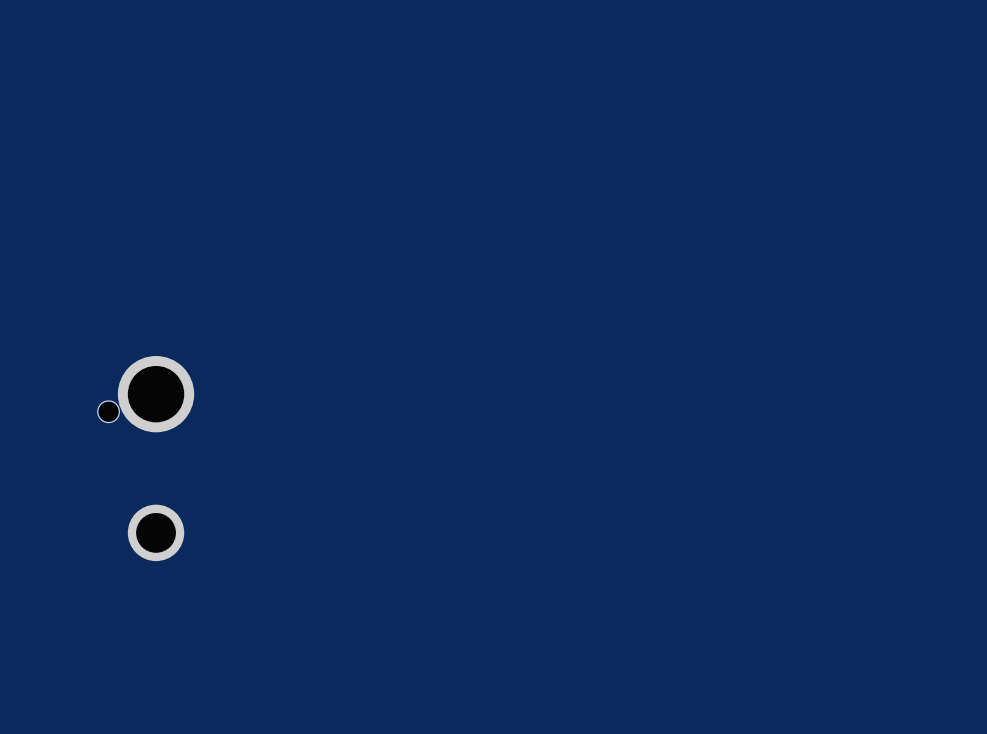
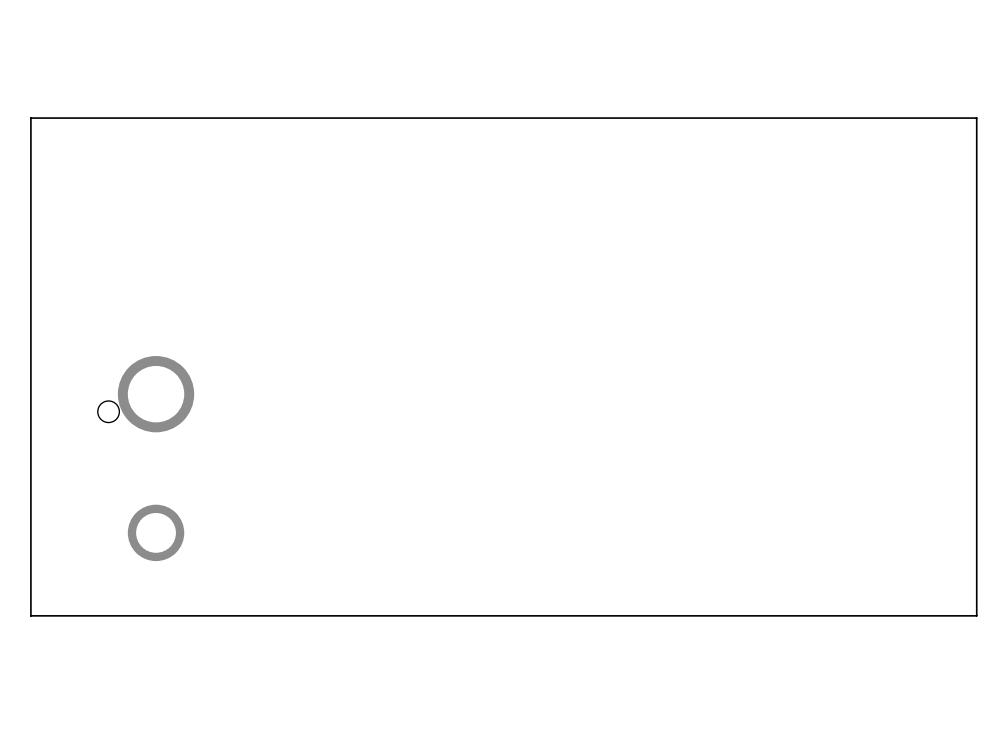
board edge: none -> (976, 118) (976, 615) (30, 615) (30, 118) (976, 118)

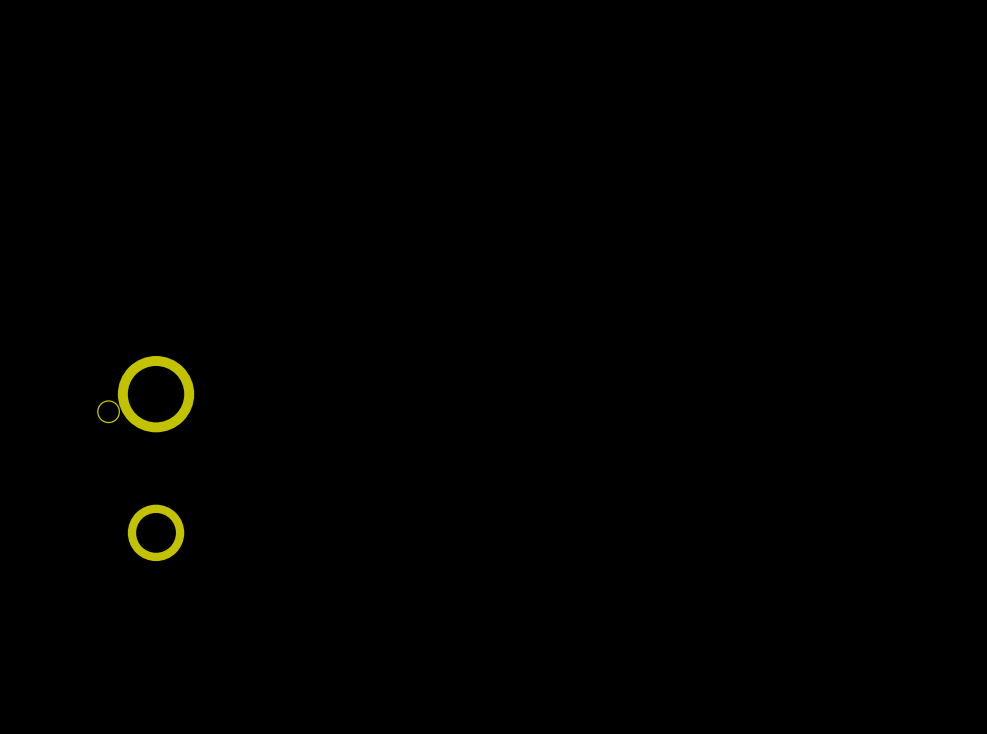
board edge: (976, 118) (976, 615) (30, 615) (30, 118) (976, 118) -> none

